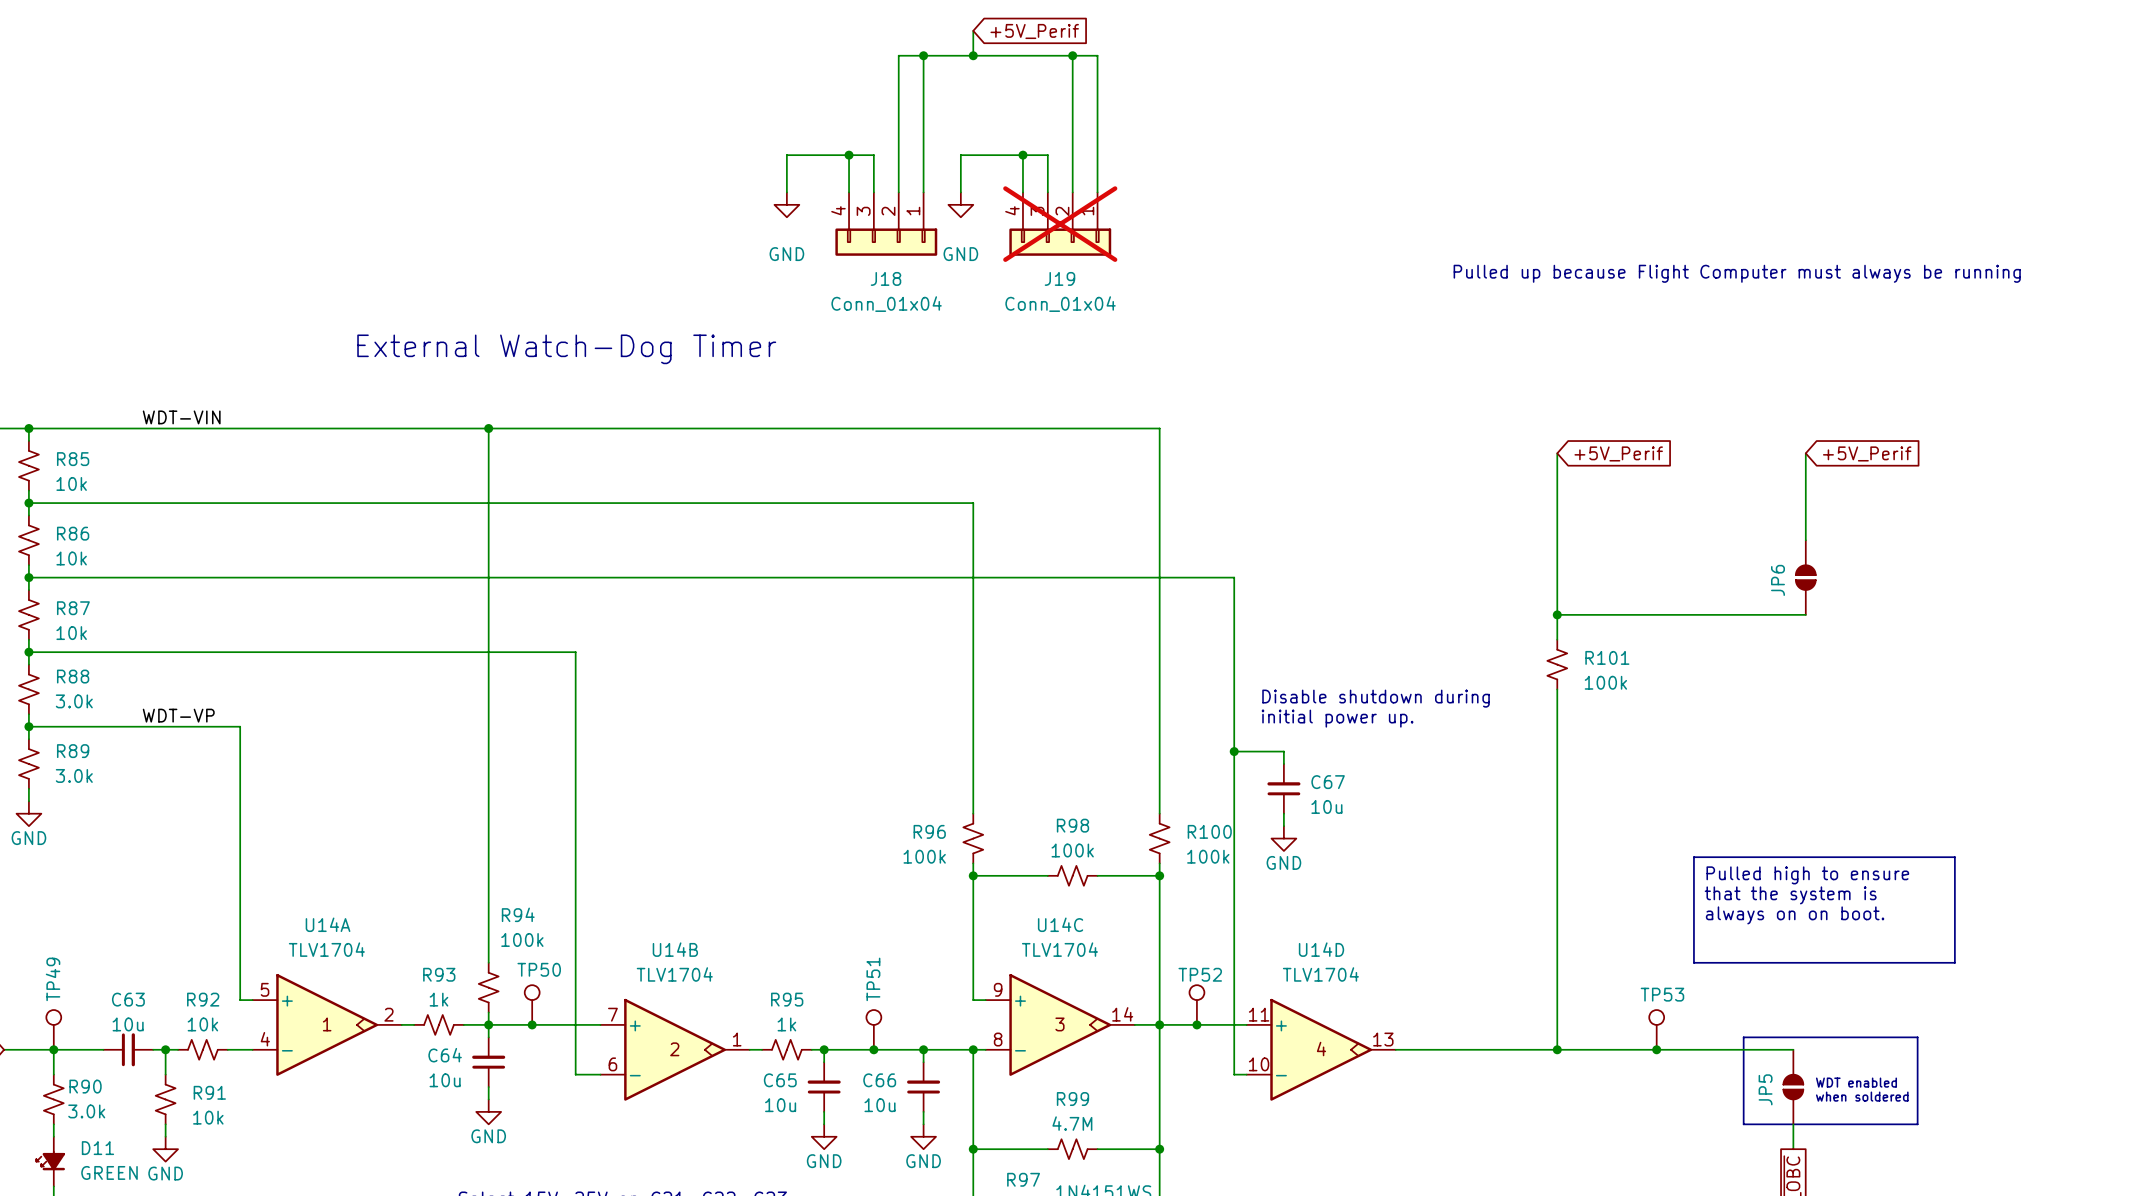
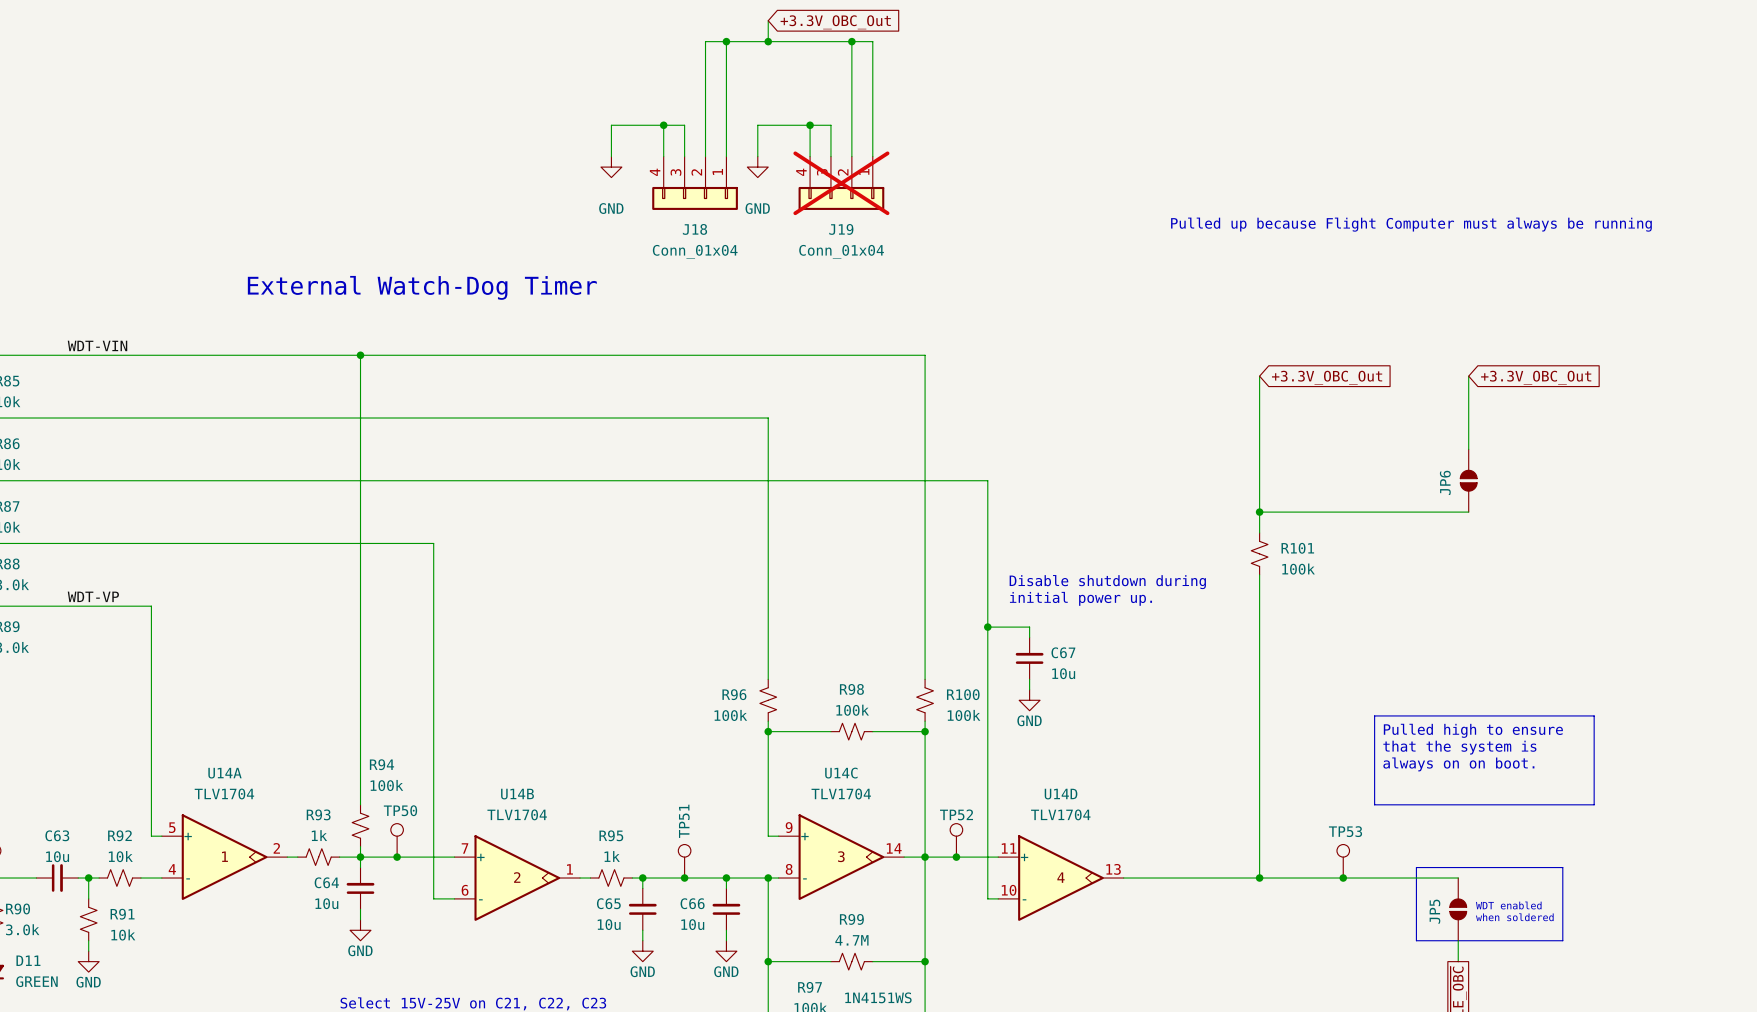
global label: +5V_Perif (1034, 31) -> +3.3V_OBC_Out (835, 22)
global label: +5V_Perif (1618, 453) -> +3.3V_OBC_Out (1327, 377)
global label: +5V_Perif (1867, 453) -> +3.3V_OBC_Out (1536, 377)

